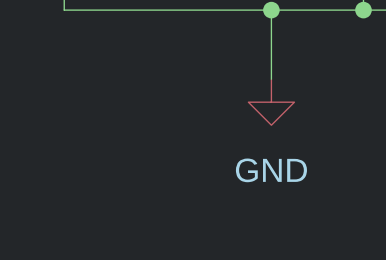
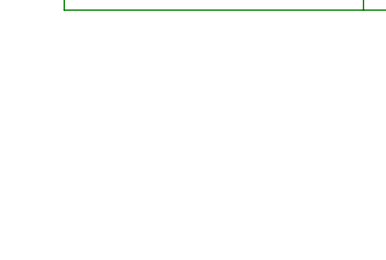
wire: (271, 10) (271, 79) -> none
junction: (271, 10) -> none
junction: (363, 10) -> none
power symbol: GND (271, 102) -> none

